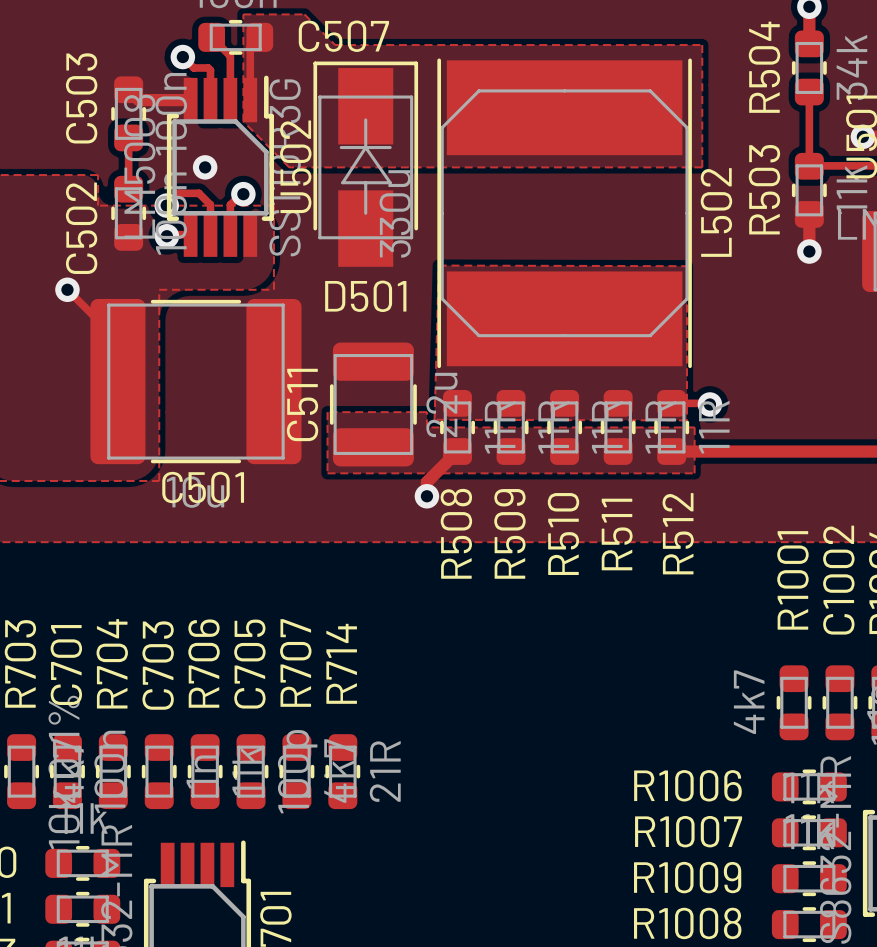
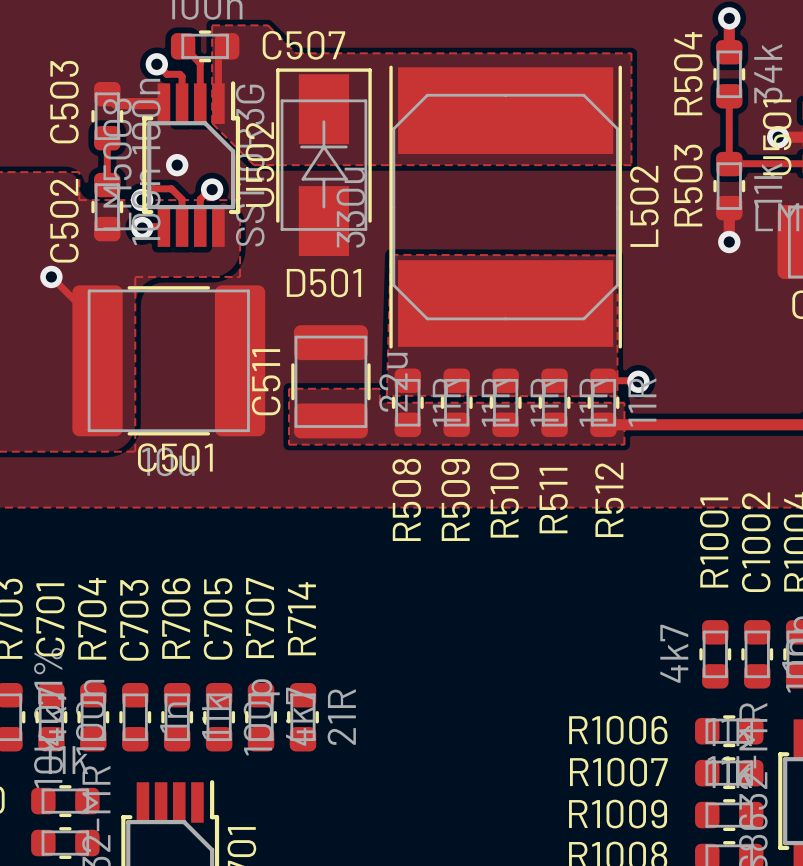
track: (457, 451) (426, 482) (426, 496) -> none
via: (426, 496) -> none

